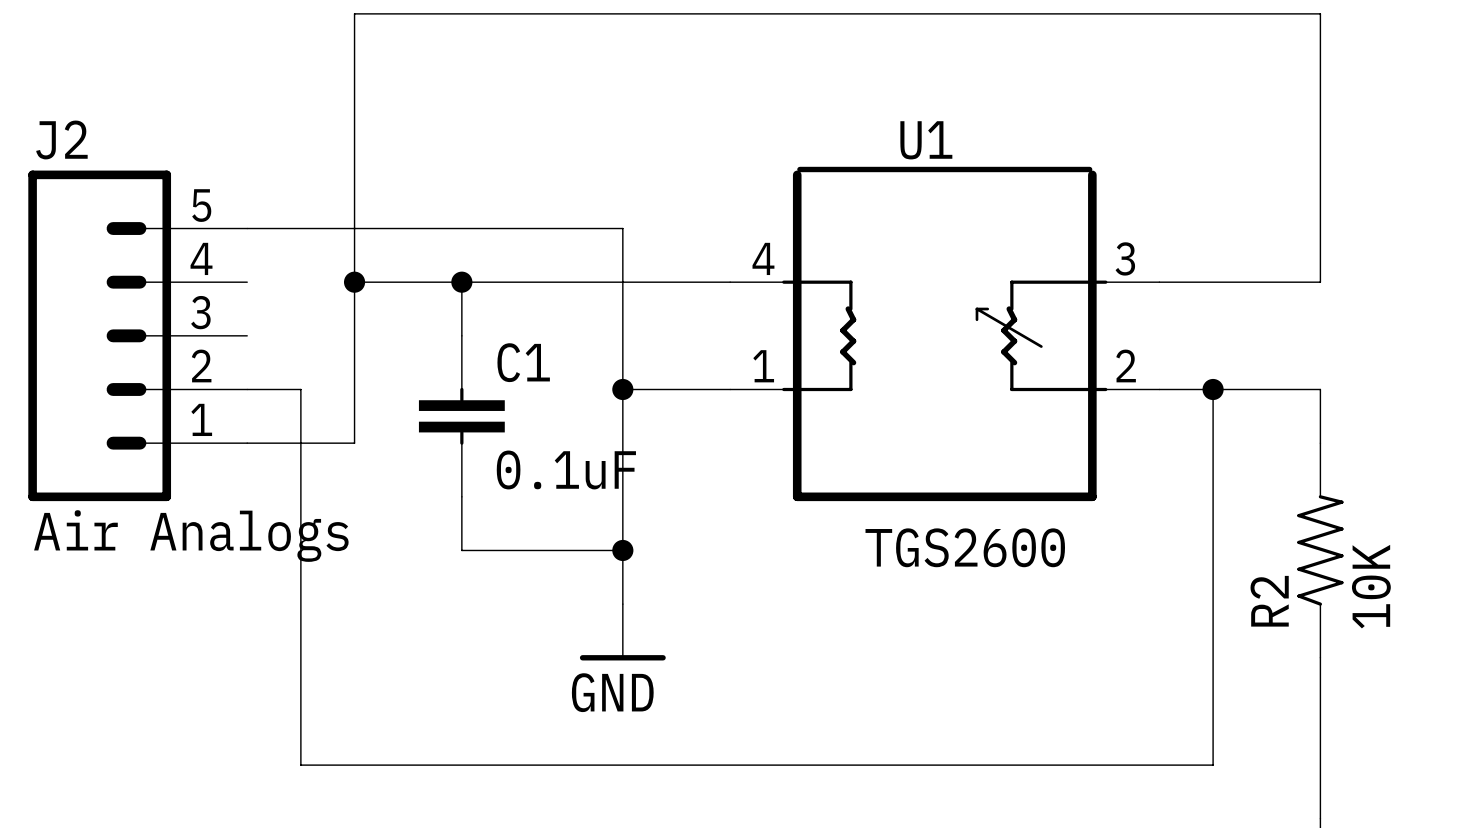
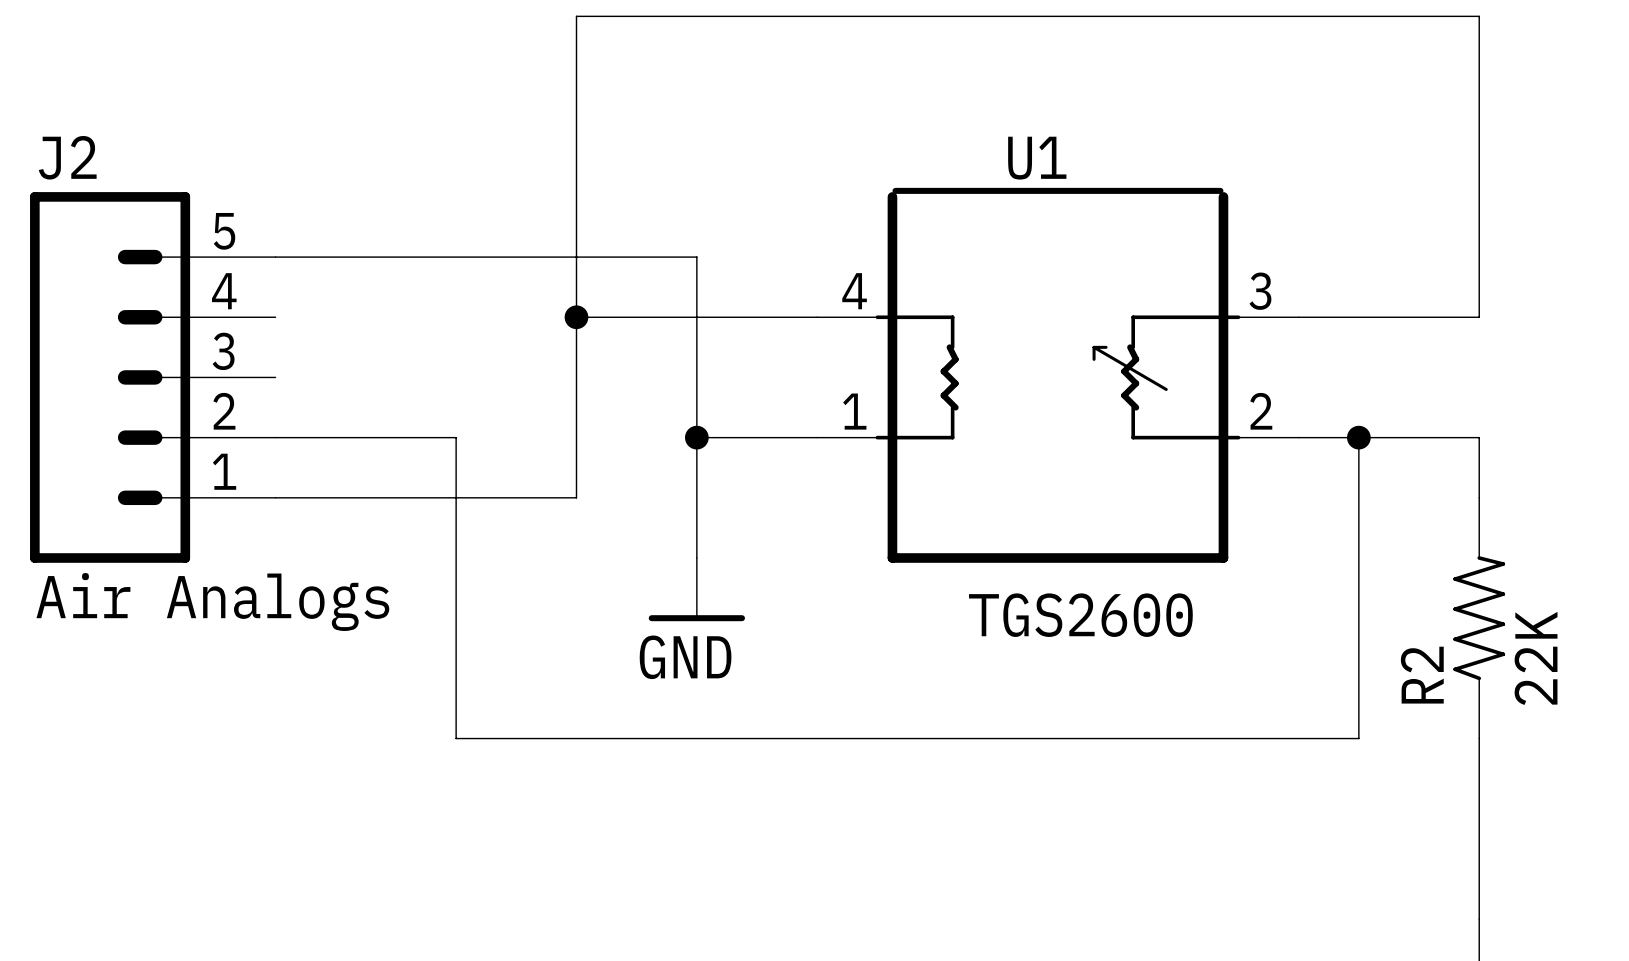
wire: (515, 13) (354, 13) (354, 443) -> (576, 16) (576, 497) (395, 497)
wire: (354, 282) (515, 282) -> none
junction: (354, 282) -> none
wire: (461, 282) (461, 335) -> none
junction position: (461, 282) -> (576, 317)
wire: (300, 389) (300, 765) (1213, 765) (1213, 657) -> (335, 437) (456, 437) (456, 738) (1358, 738)
C1: 0.1uF (461, 416) -> none
wire: (461, 496) (461, 550) (622, 550) -> none
junction: (622, 550) -> none
R2 value: 10K (1371, 586) -> 22K (1536, 658)
power symbol position: GND (622, 632) -> GND (696, 589)

